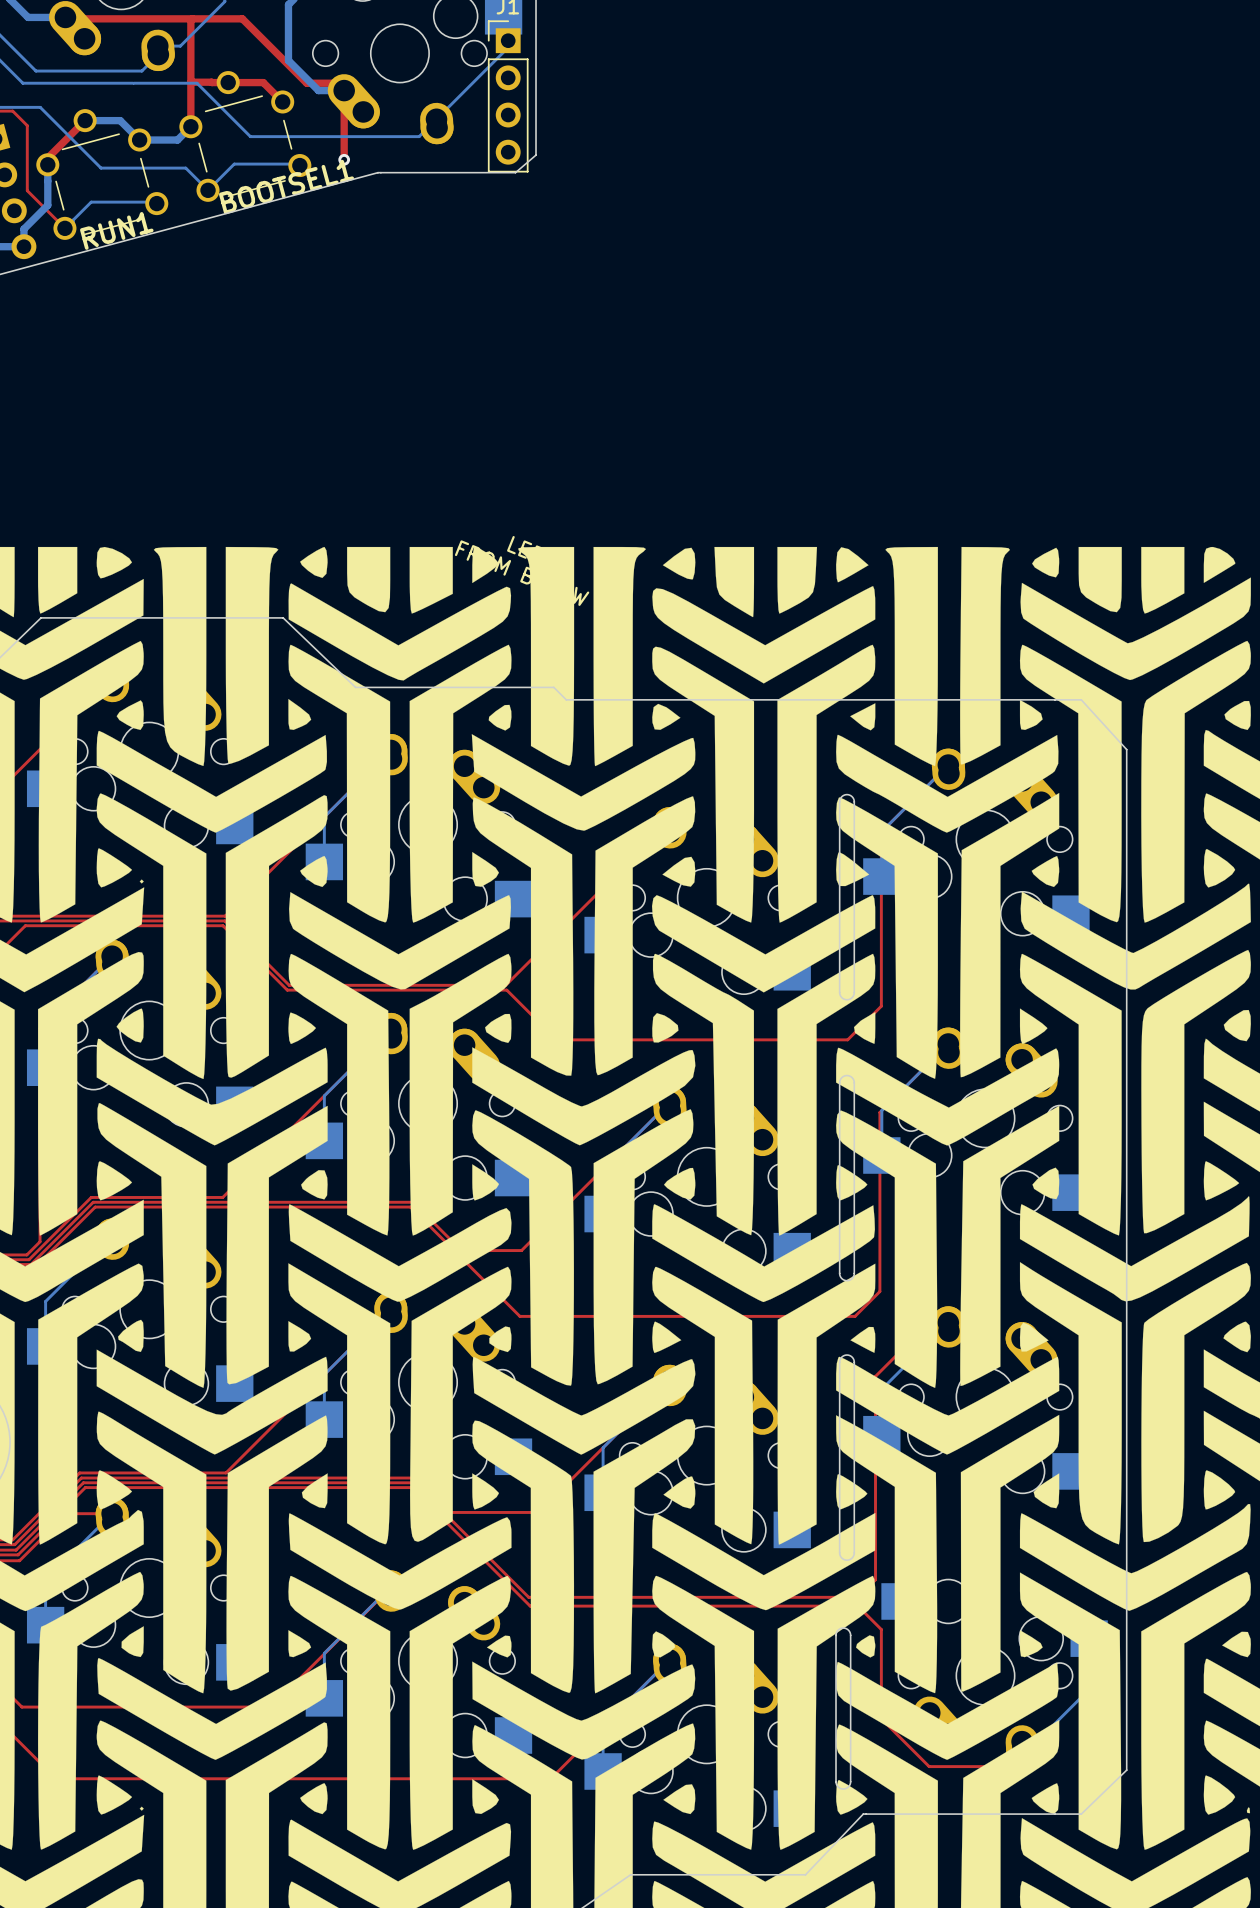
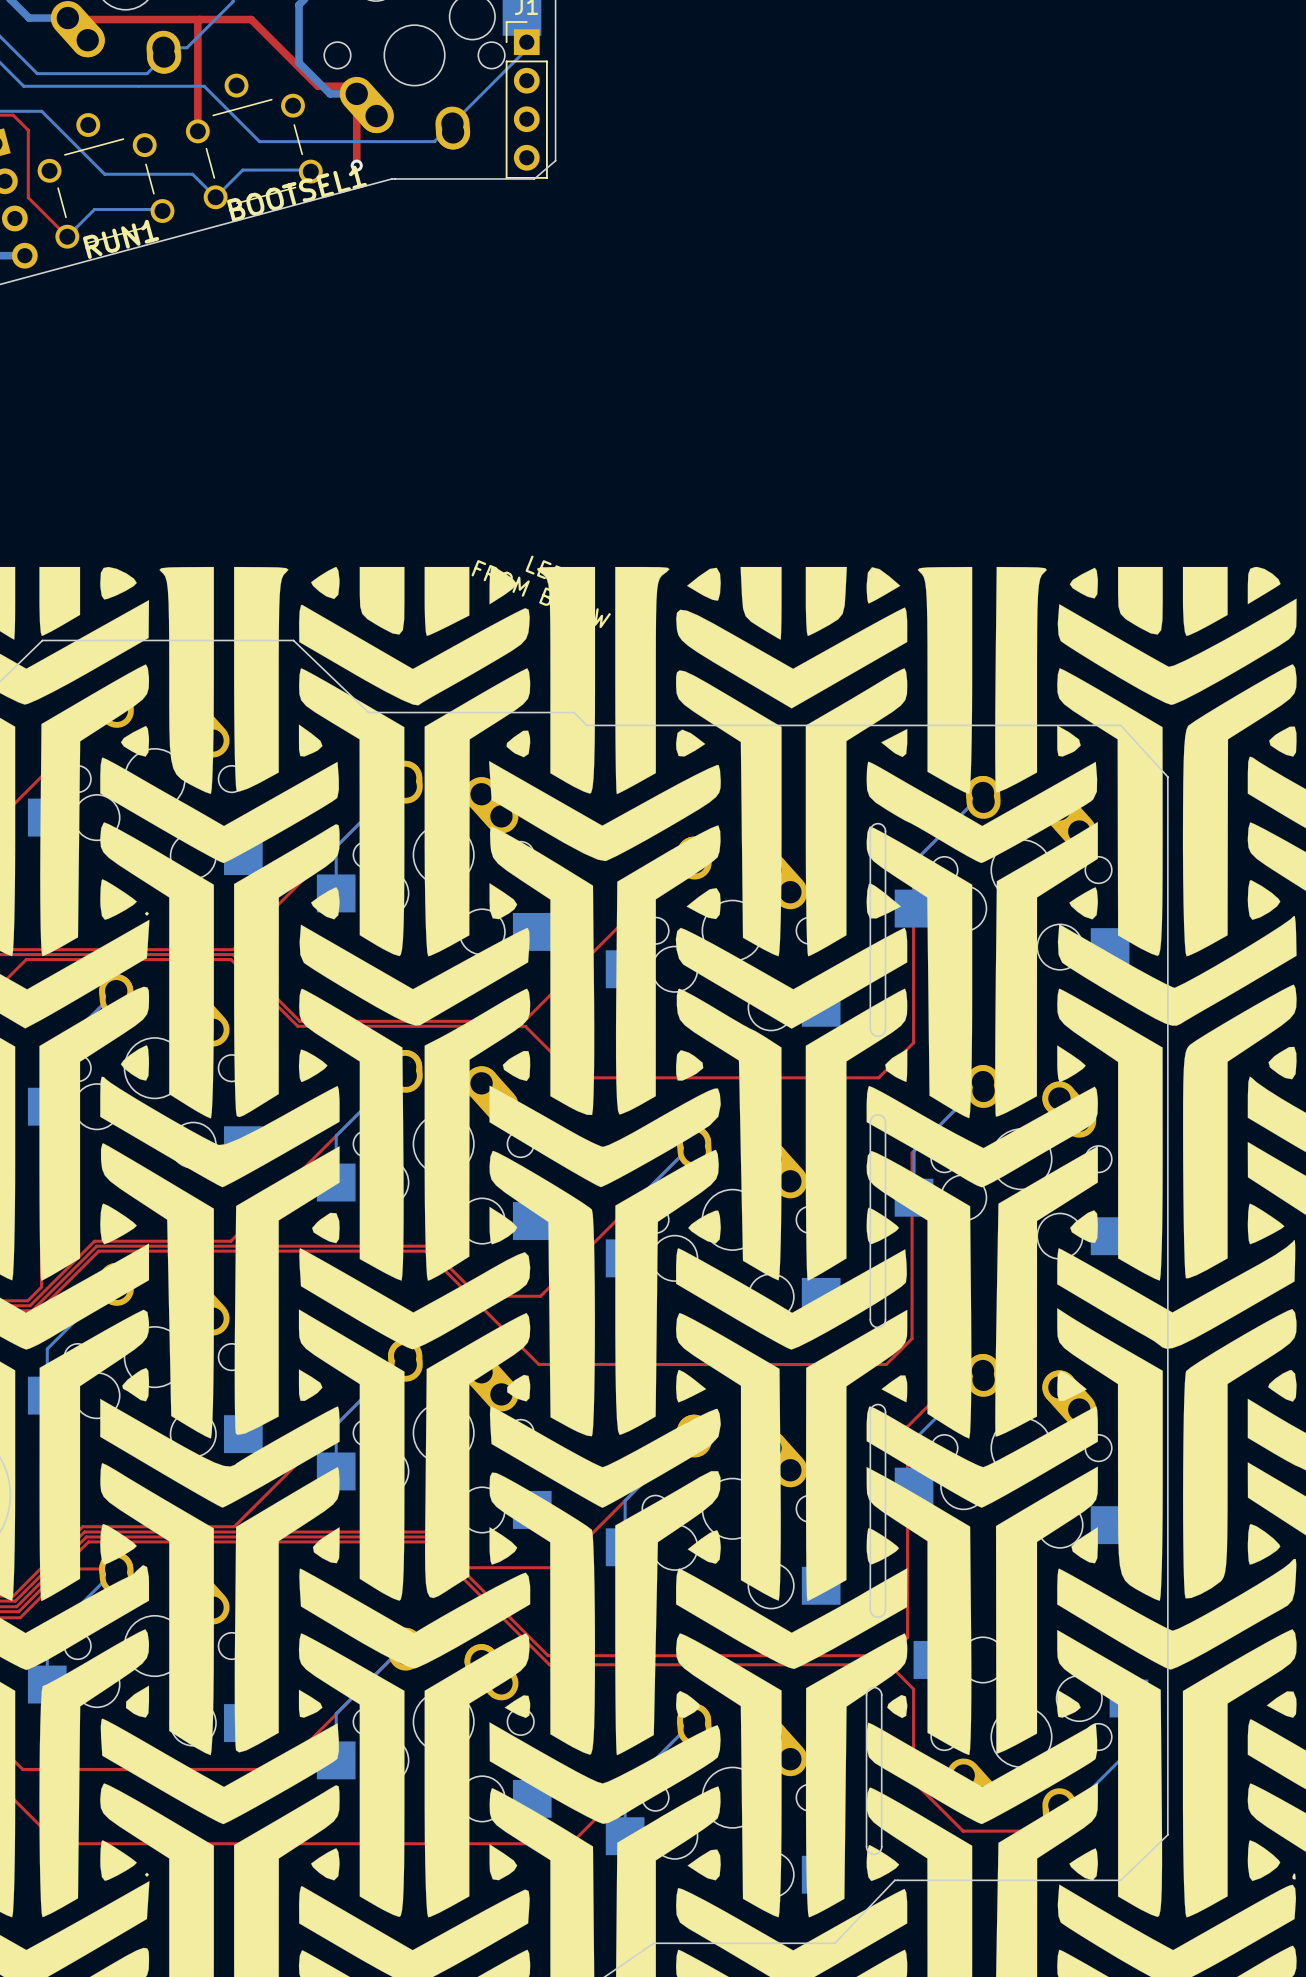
top track: (190, 82) (263, 82) (282, 101) -> none
bottom track: (85, 120) (120, 120) (139, 140) (177, 140) (190, 126) -> none
top track: (85, 120) (47, 157) (47, 164) -> none
bottom track: (47, 164) (47, 205) (23, 229) (23, 246) -> none

